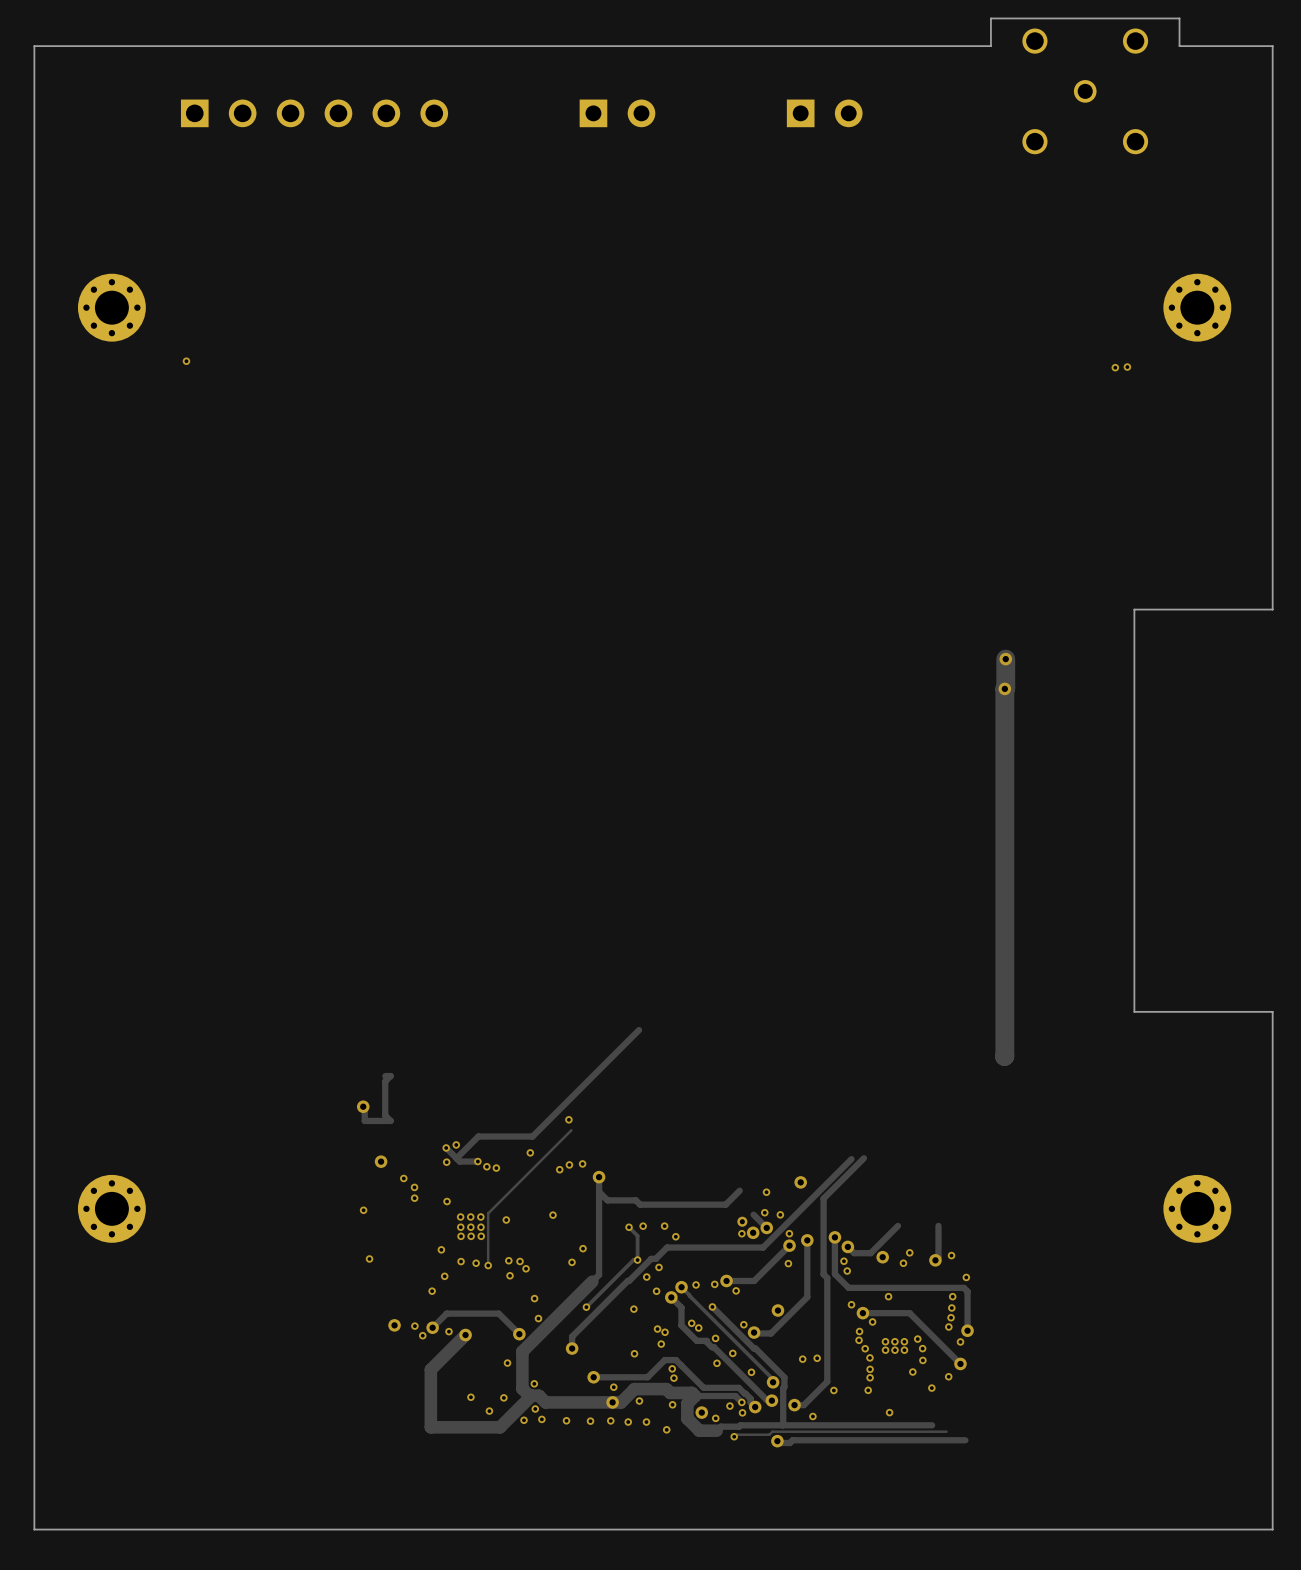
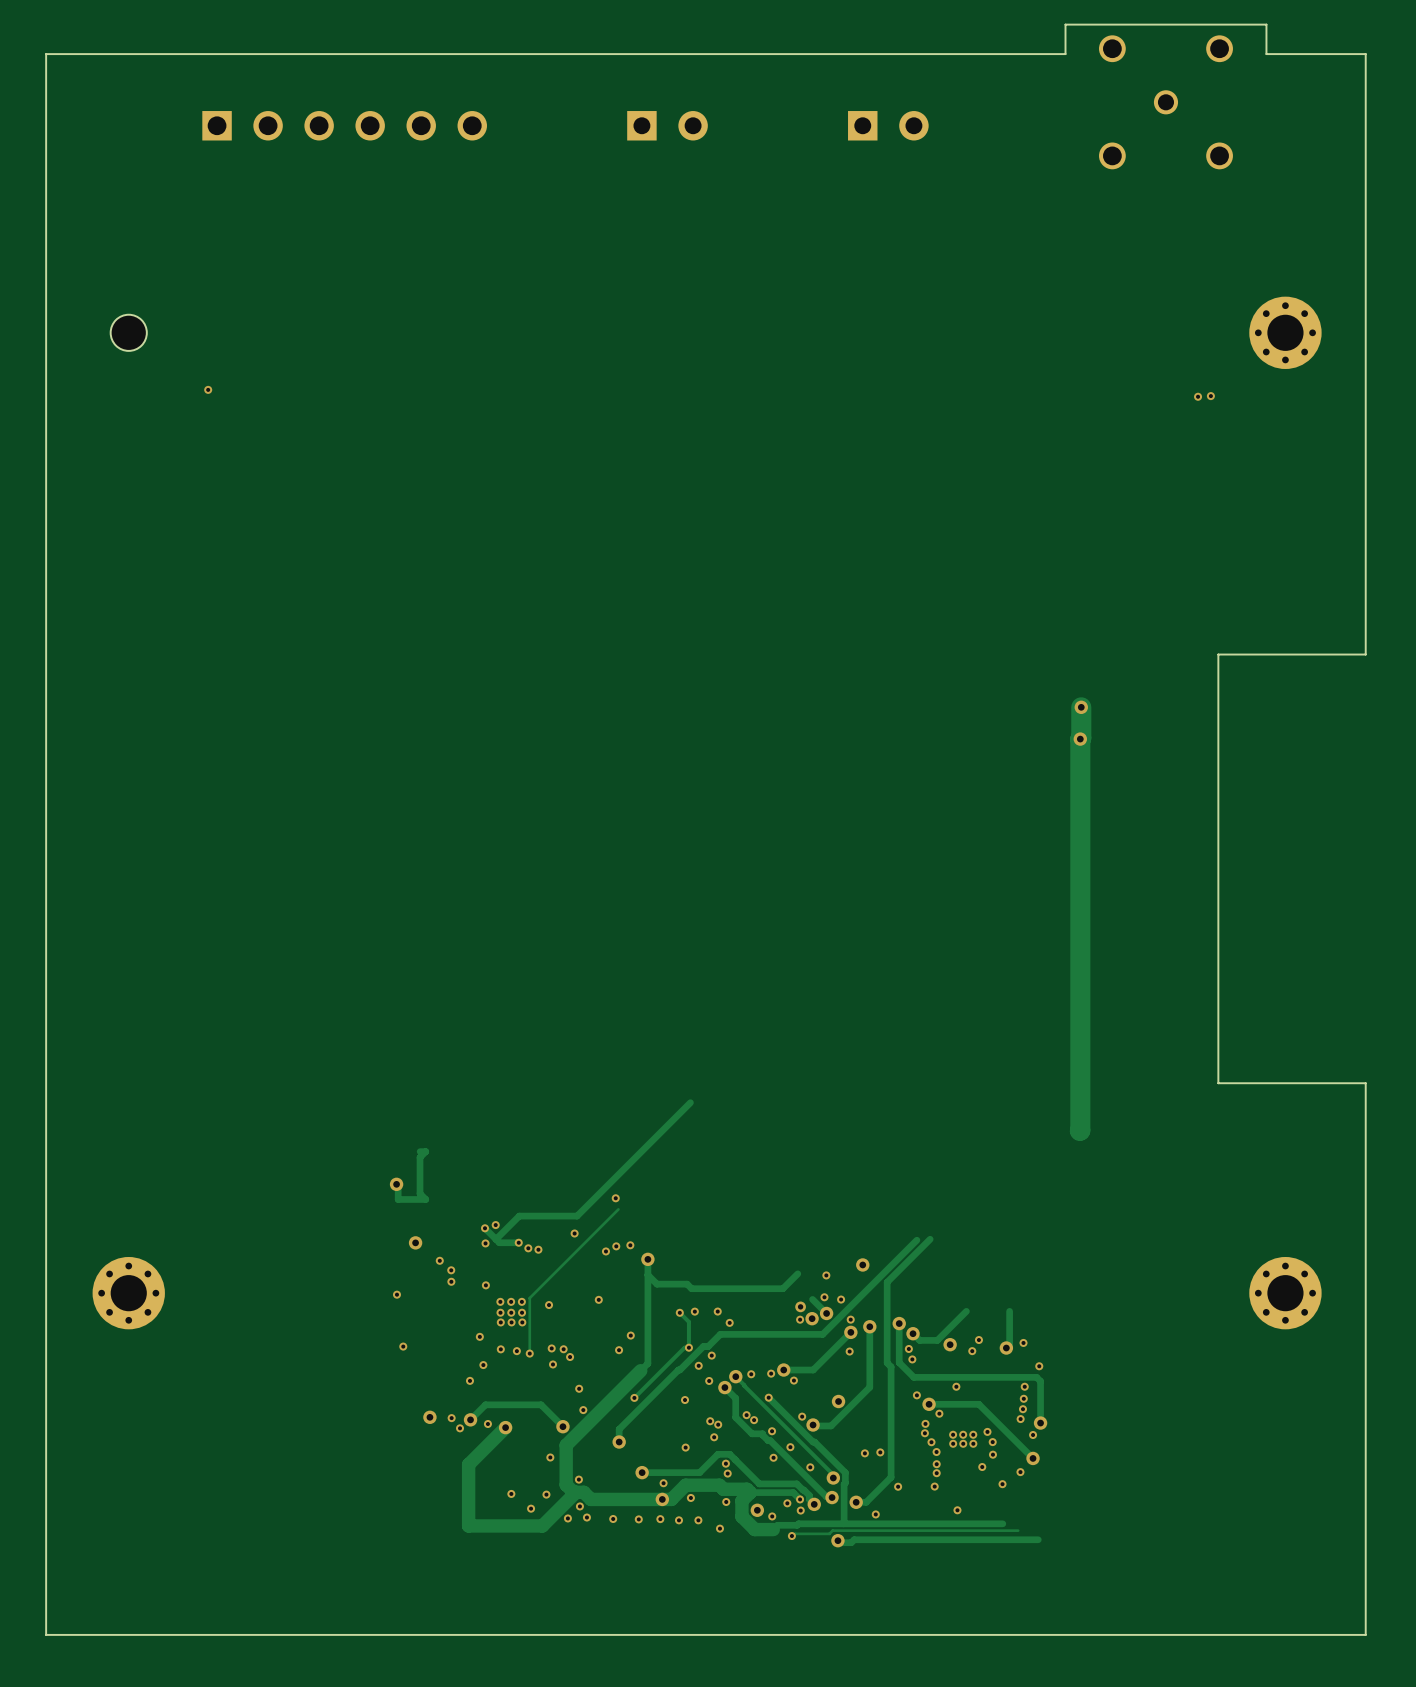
part footprint: [77, 273, 146, 342] -> [110, 314, 147, 351]

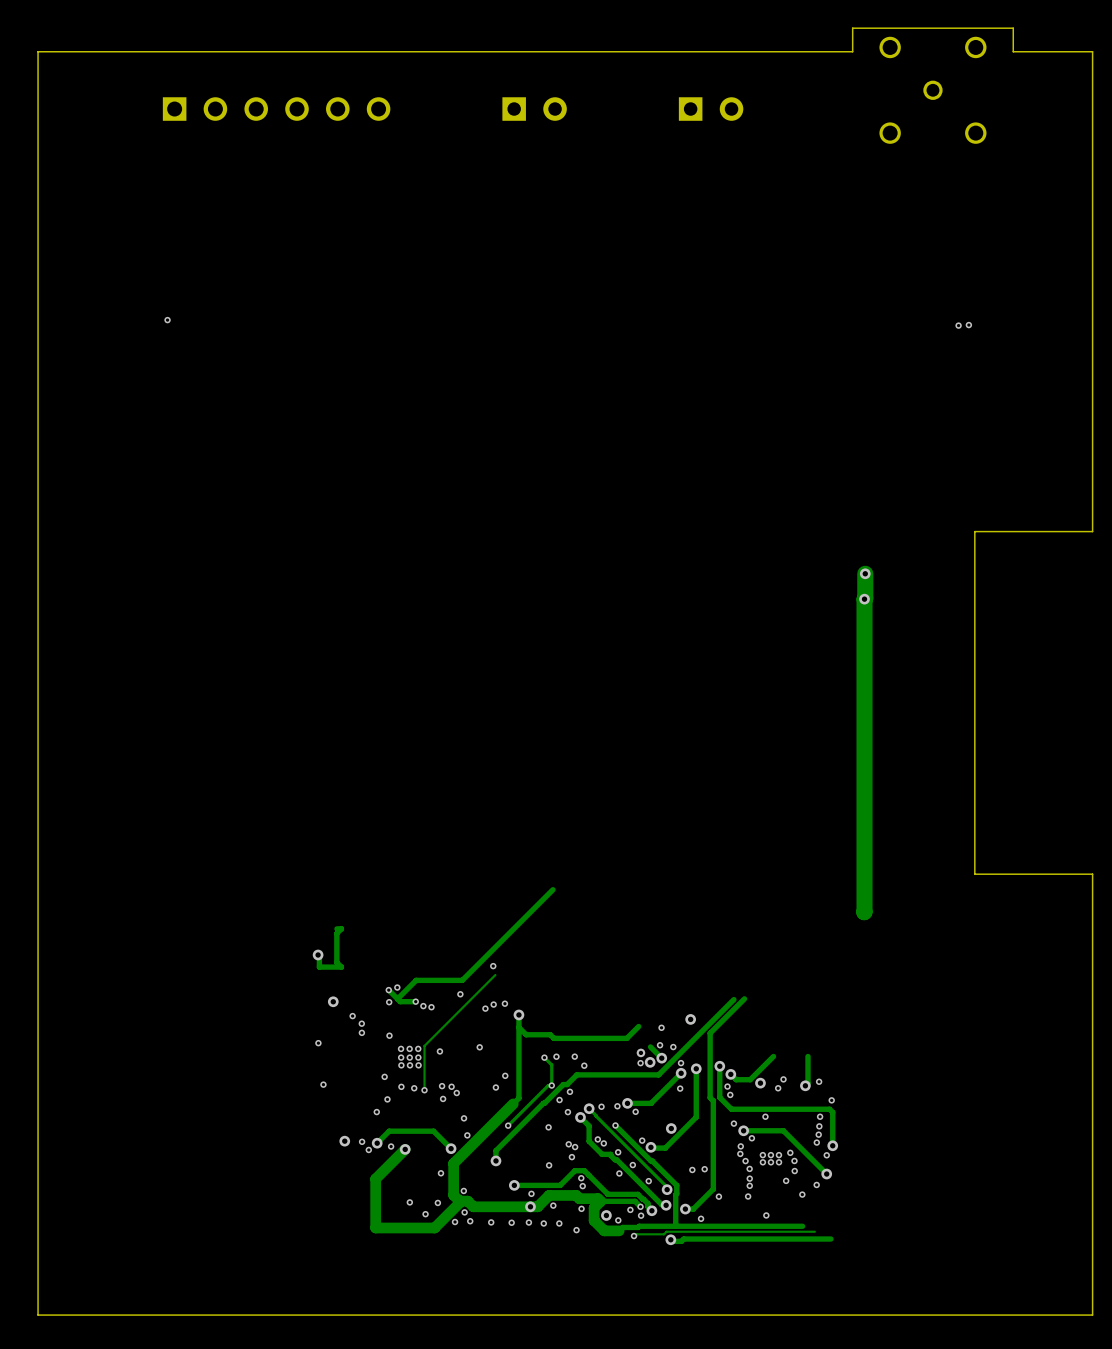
part: (128, 332) -> none
part: (1285, 332) -> none
part: (128, 1293) -> none
part: (1285, 1293) -> none

